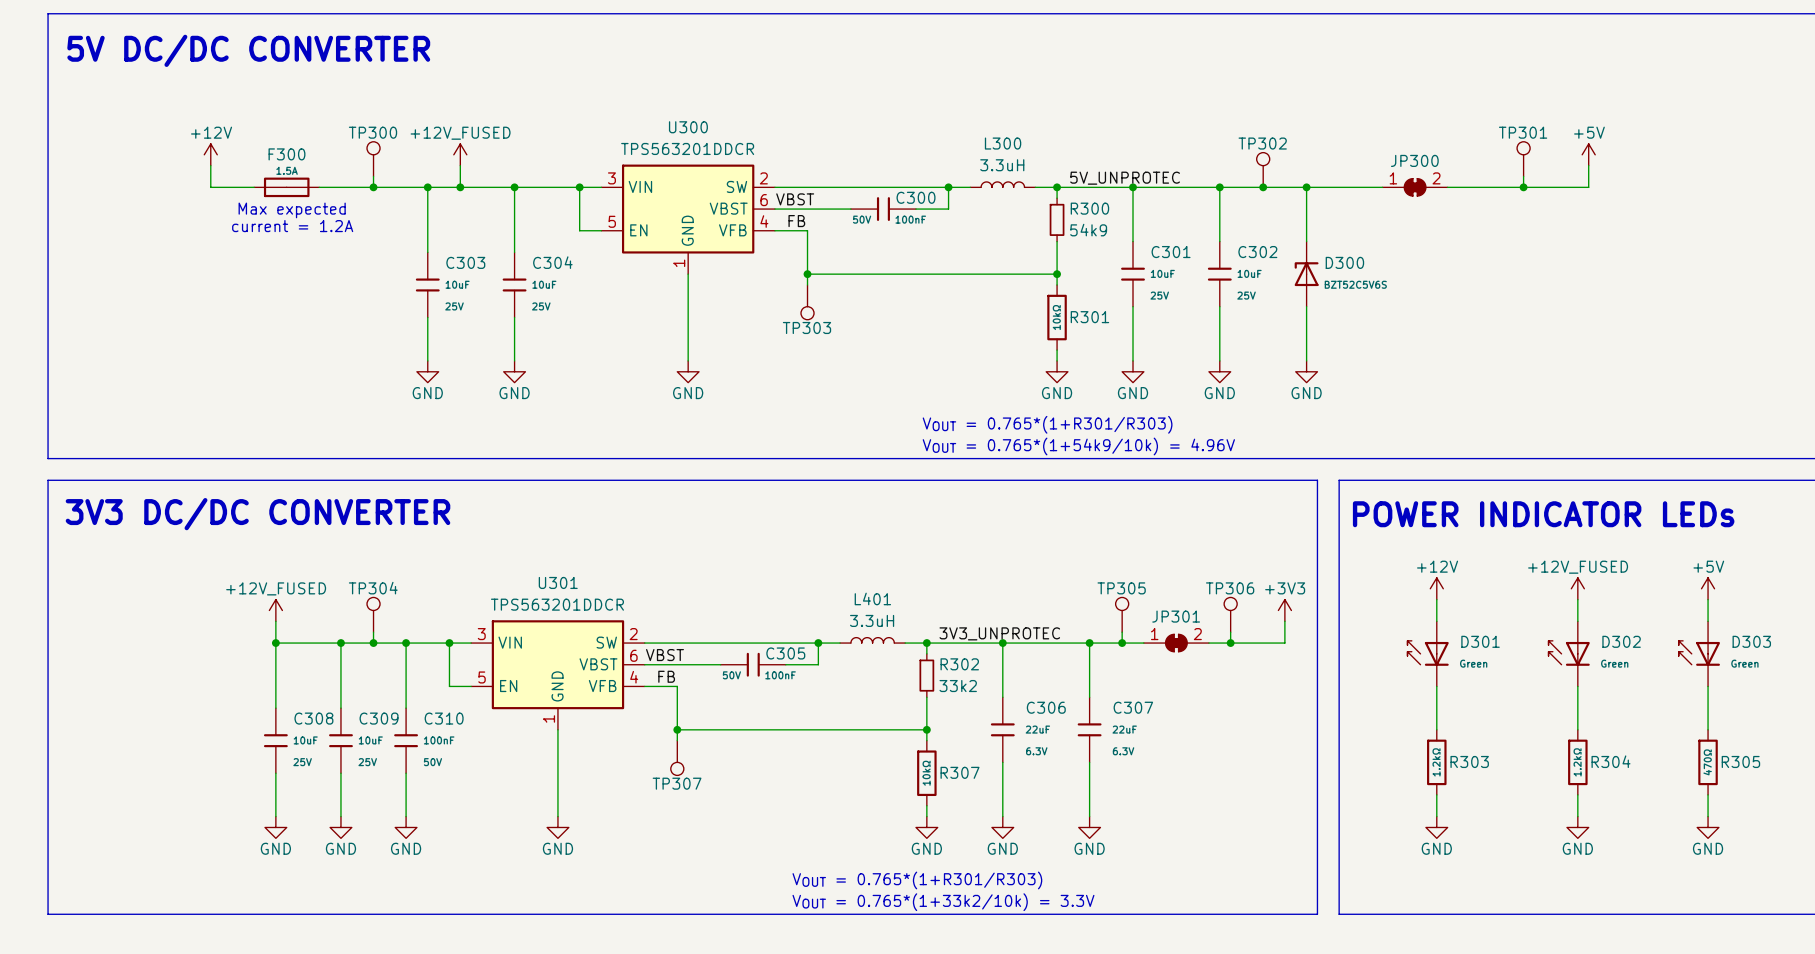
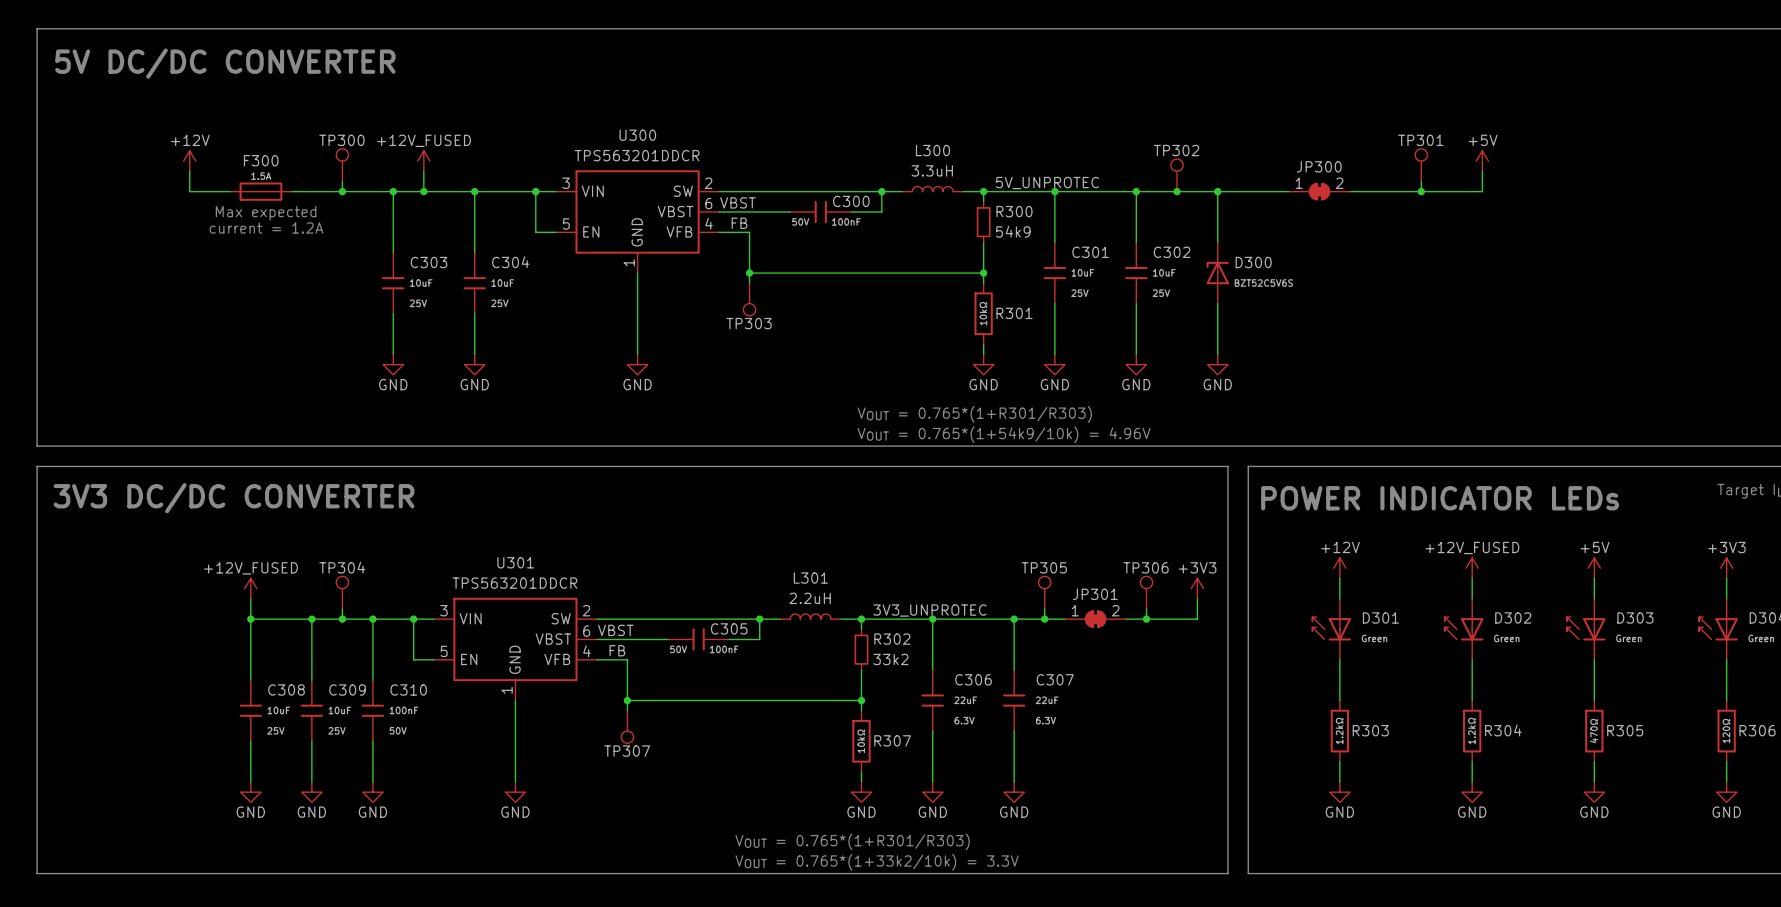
L401 name: L401 (872, 598) -> L301 (810, 578)
L401 value: 3.3uH (872, 620) -> 2.2uH (810, 598)

